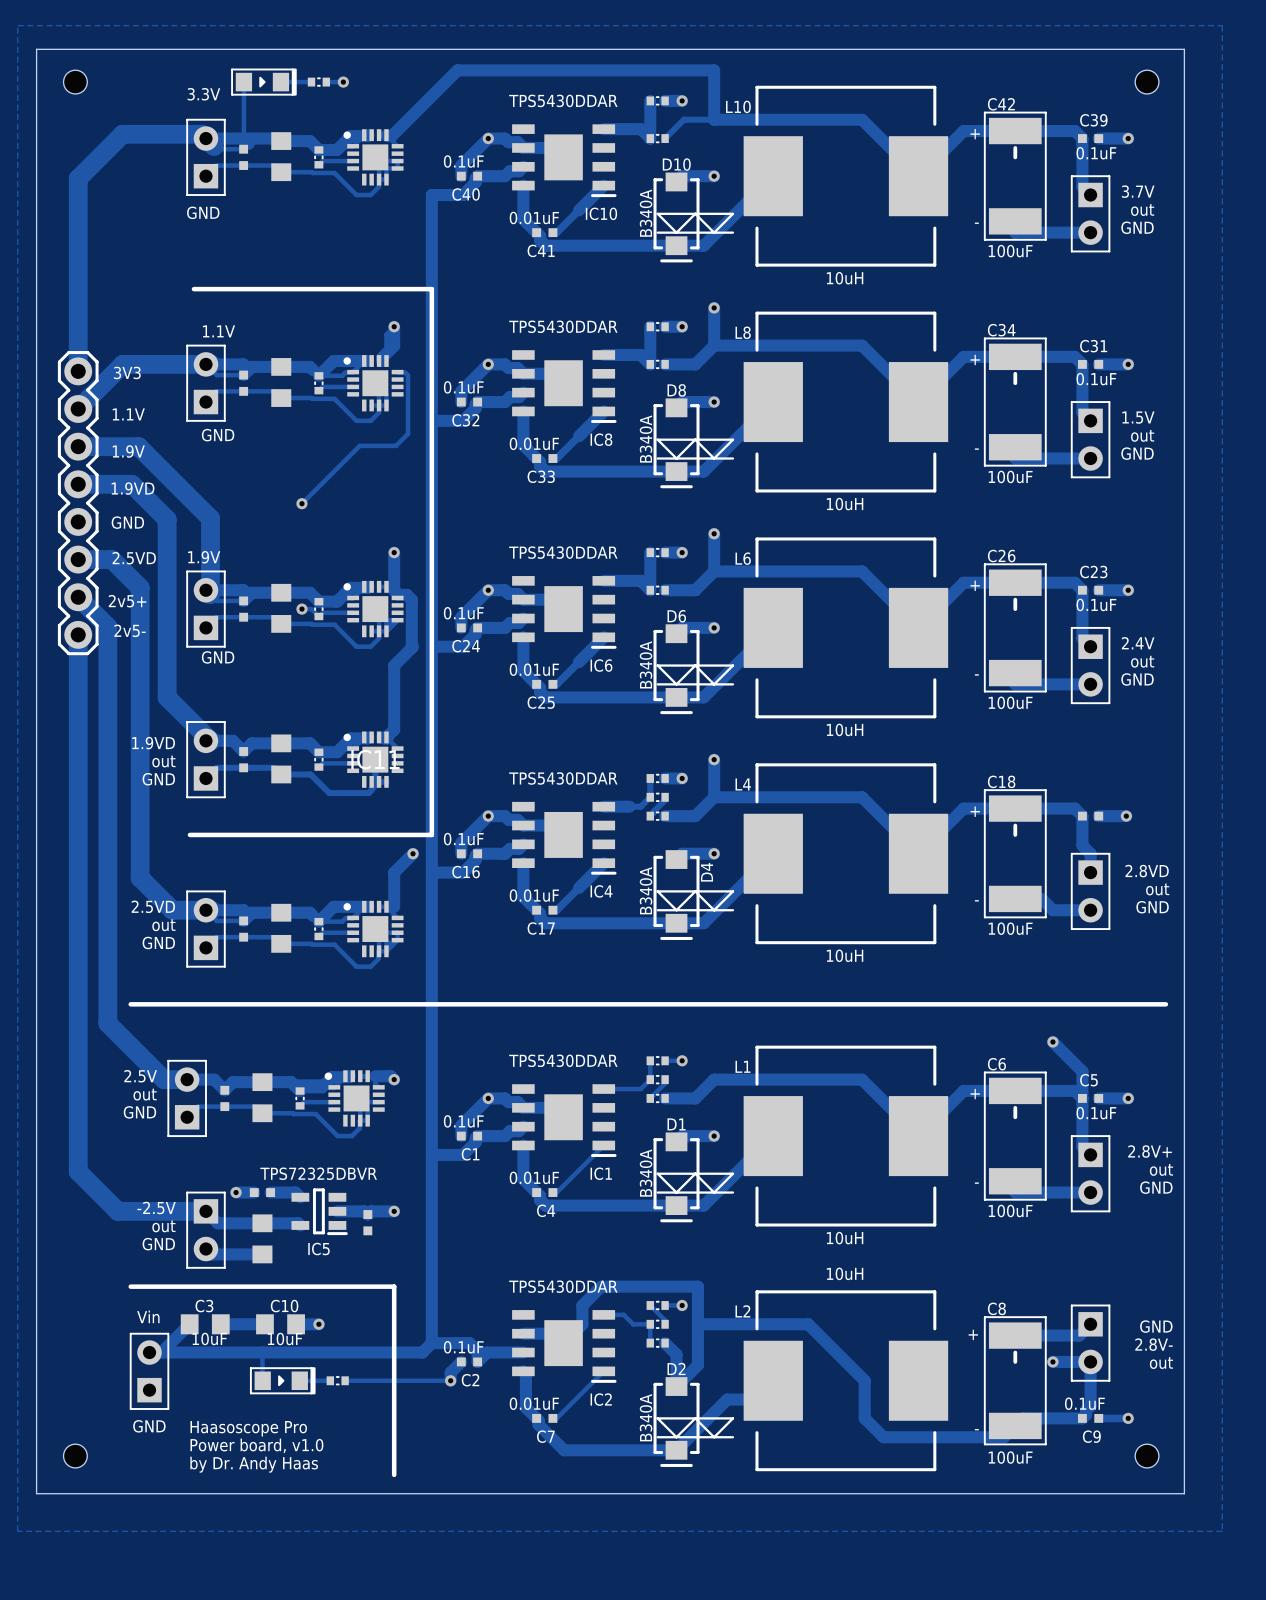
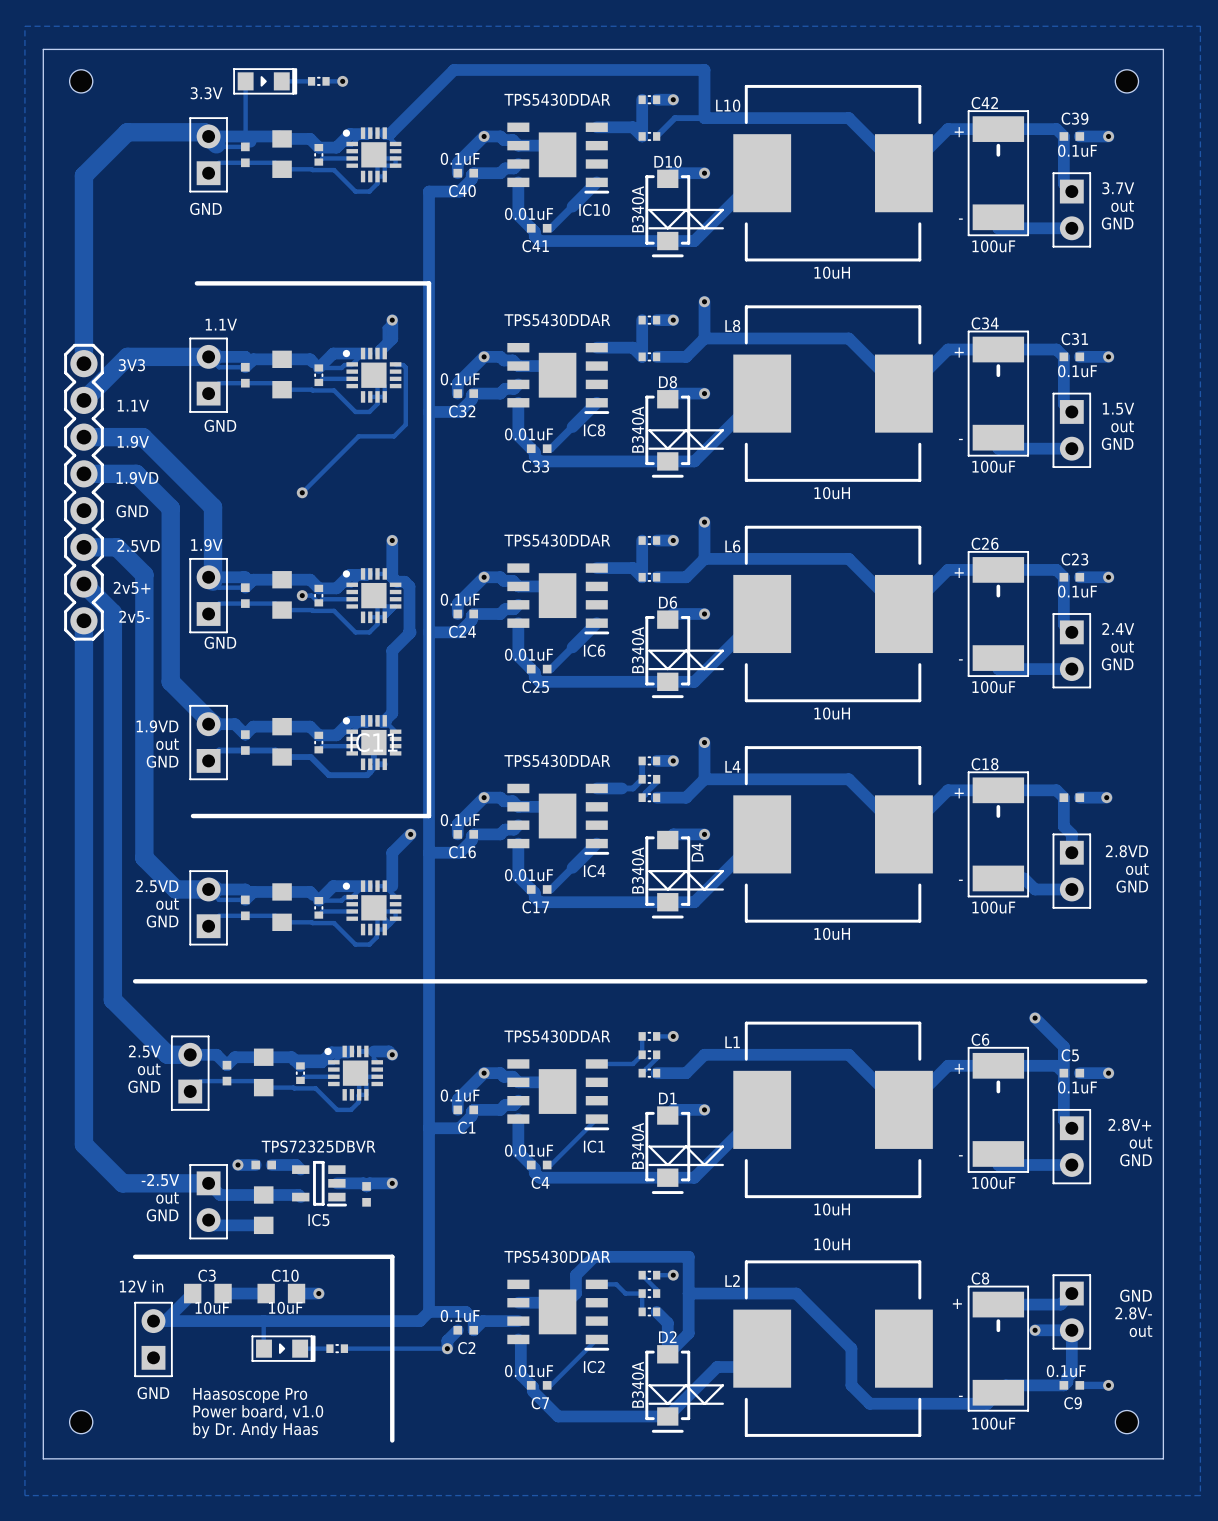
text: Vin (148, 1316) -> 12V in (141, 1286)

